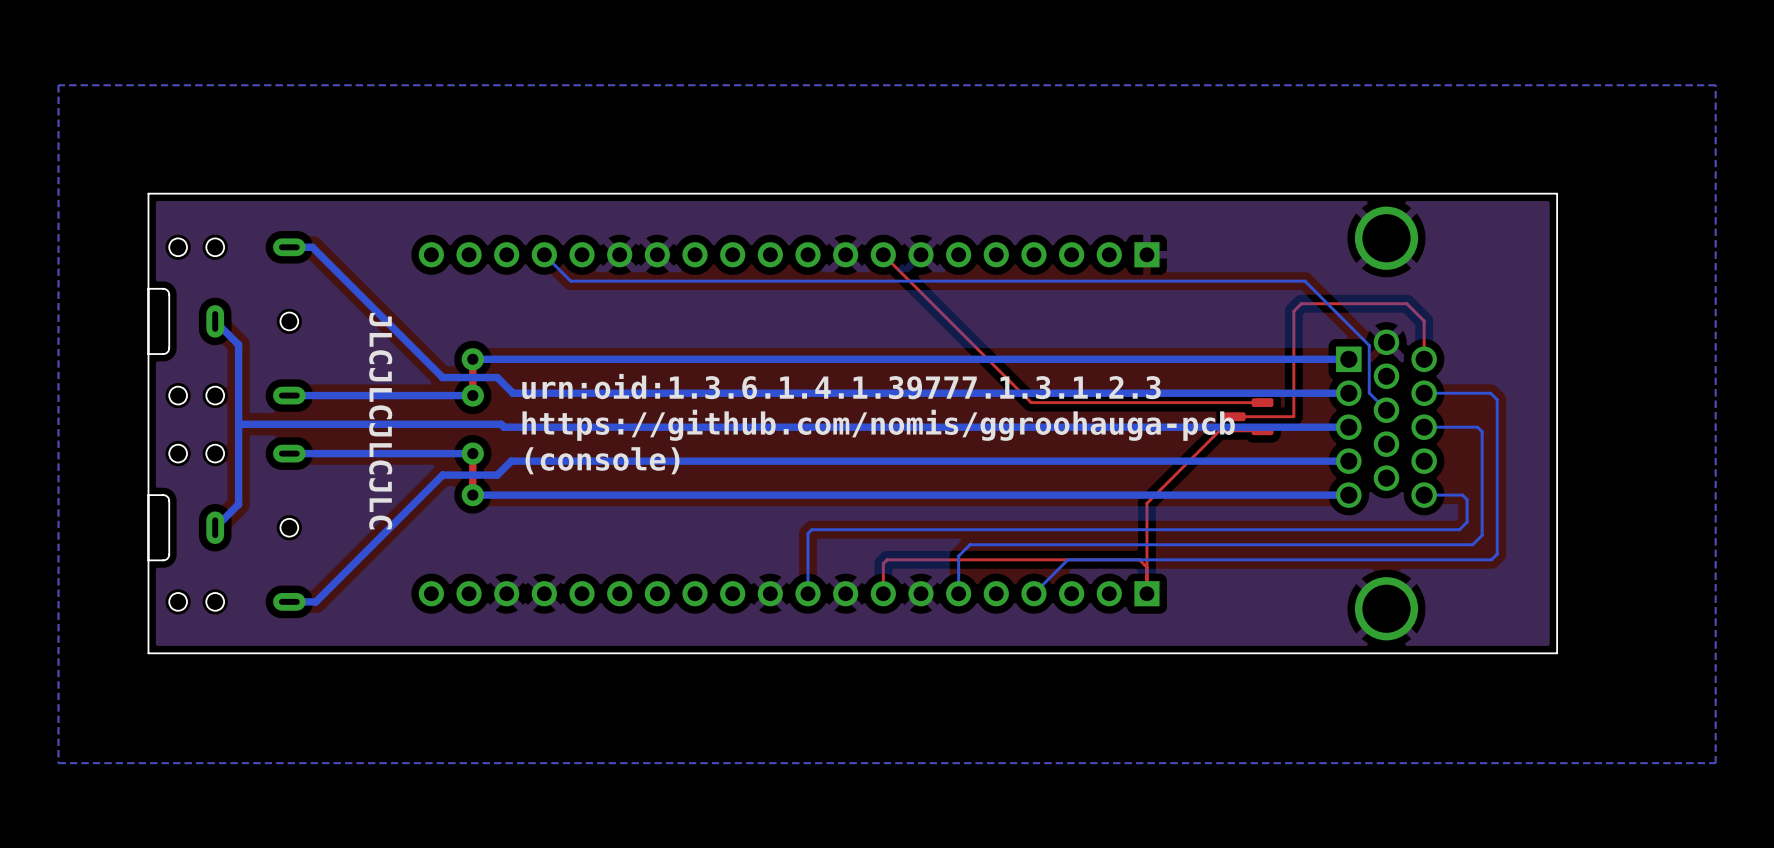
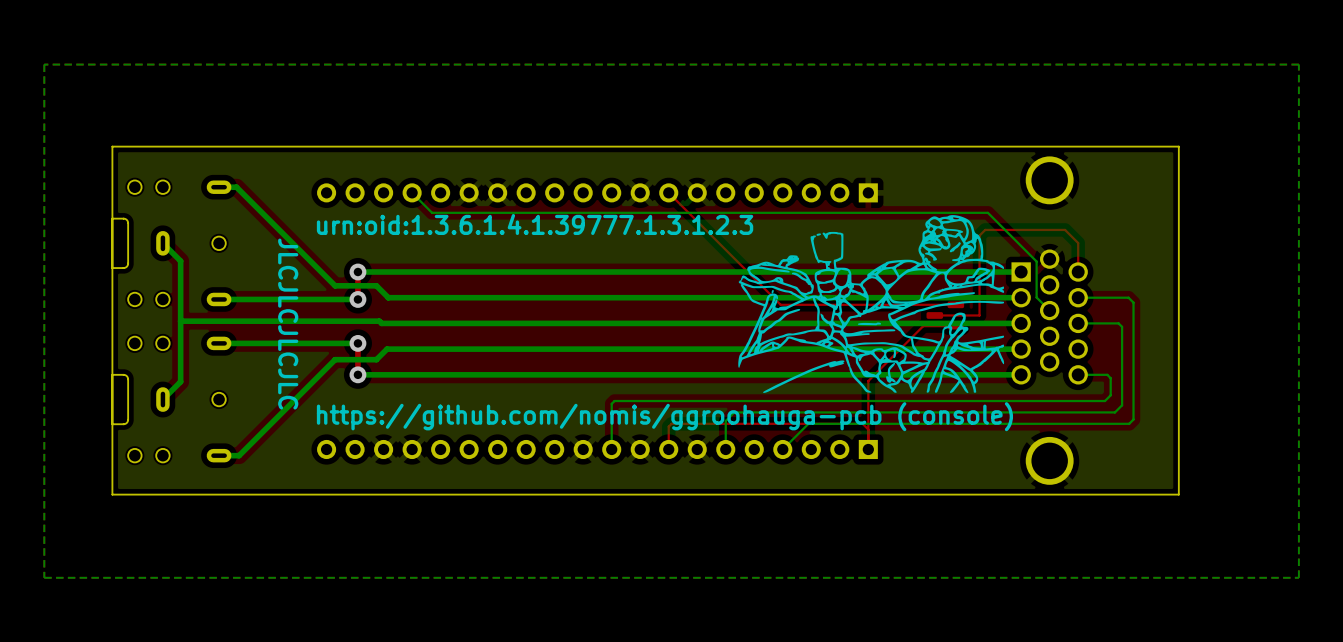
drawing: none -> [738, 215, 1005, 394]
text position: urn:oid:1.3.6.1.4.1.39777.1.3.1.2.3 (841, 386) -> urn:oid:1.3.6.1.4.1.39777.1.3.1.2.3 (535, 224)
text: https://github.com/nomis/ggroohauga-pcb (878, 425) -> none
text: (console) (602, 460) -> none
text: none -> https://github.com/nomis/ggroohauga-pcb (console) (664, 416)

